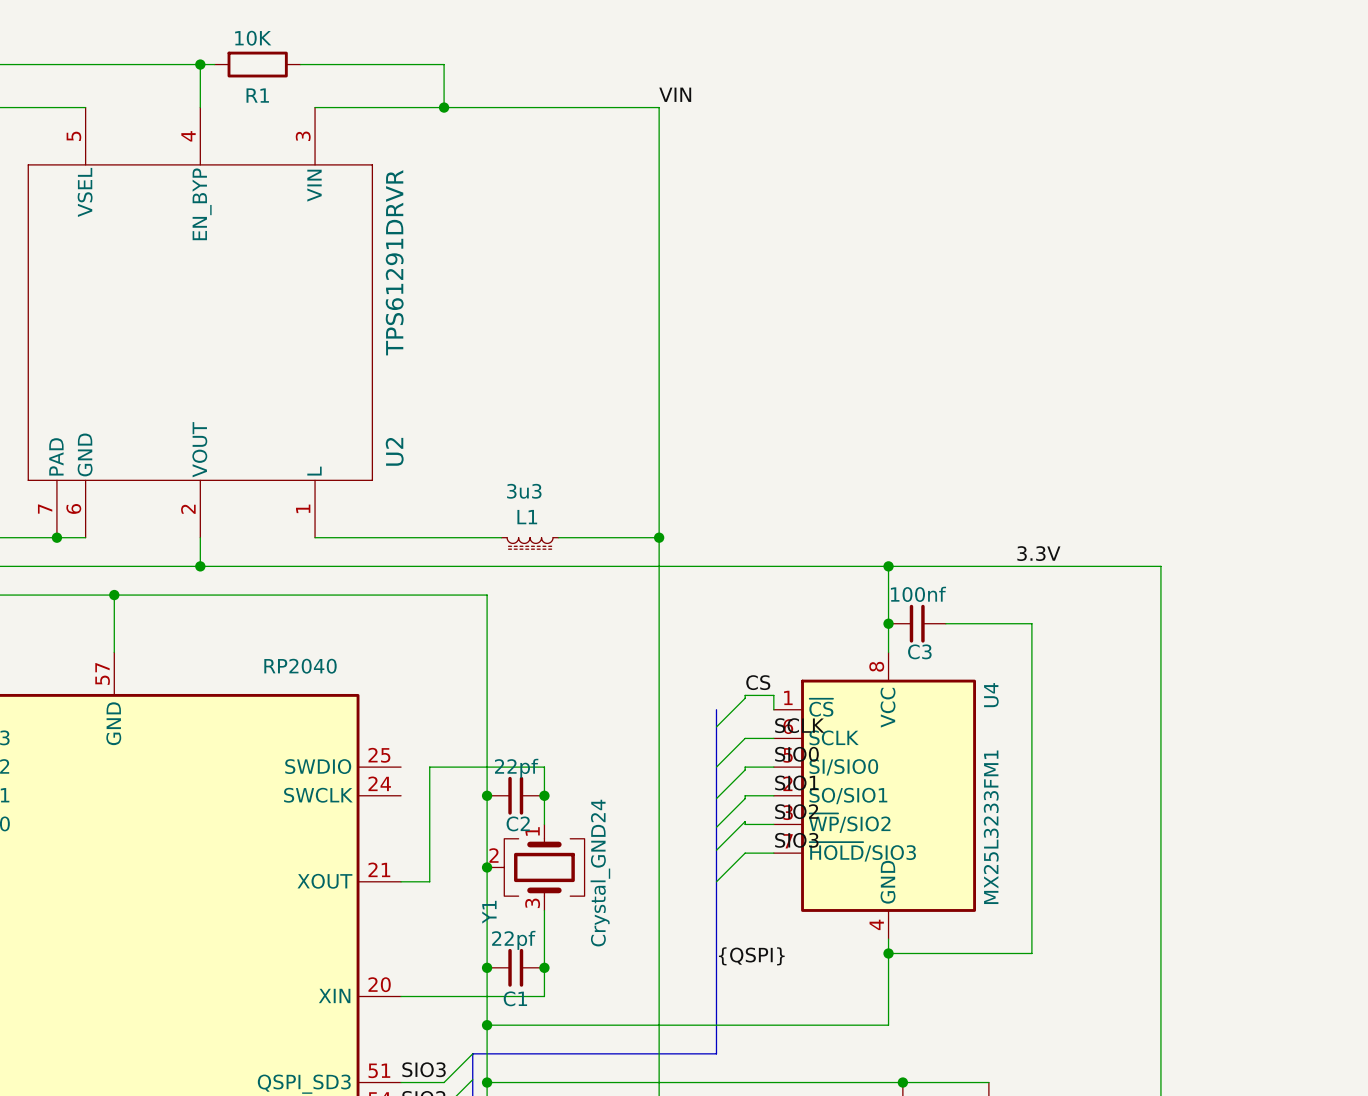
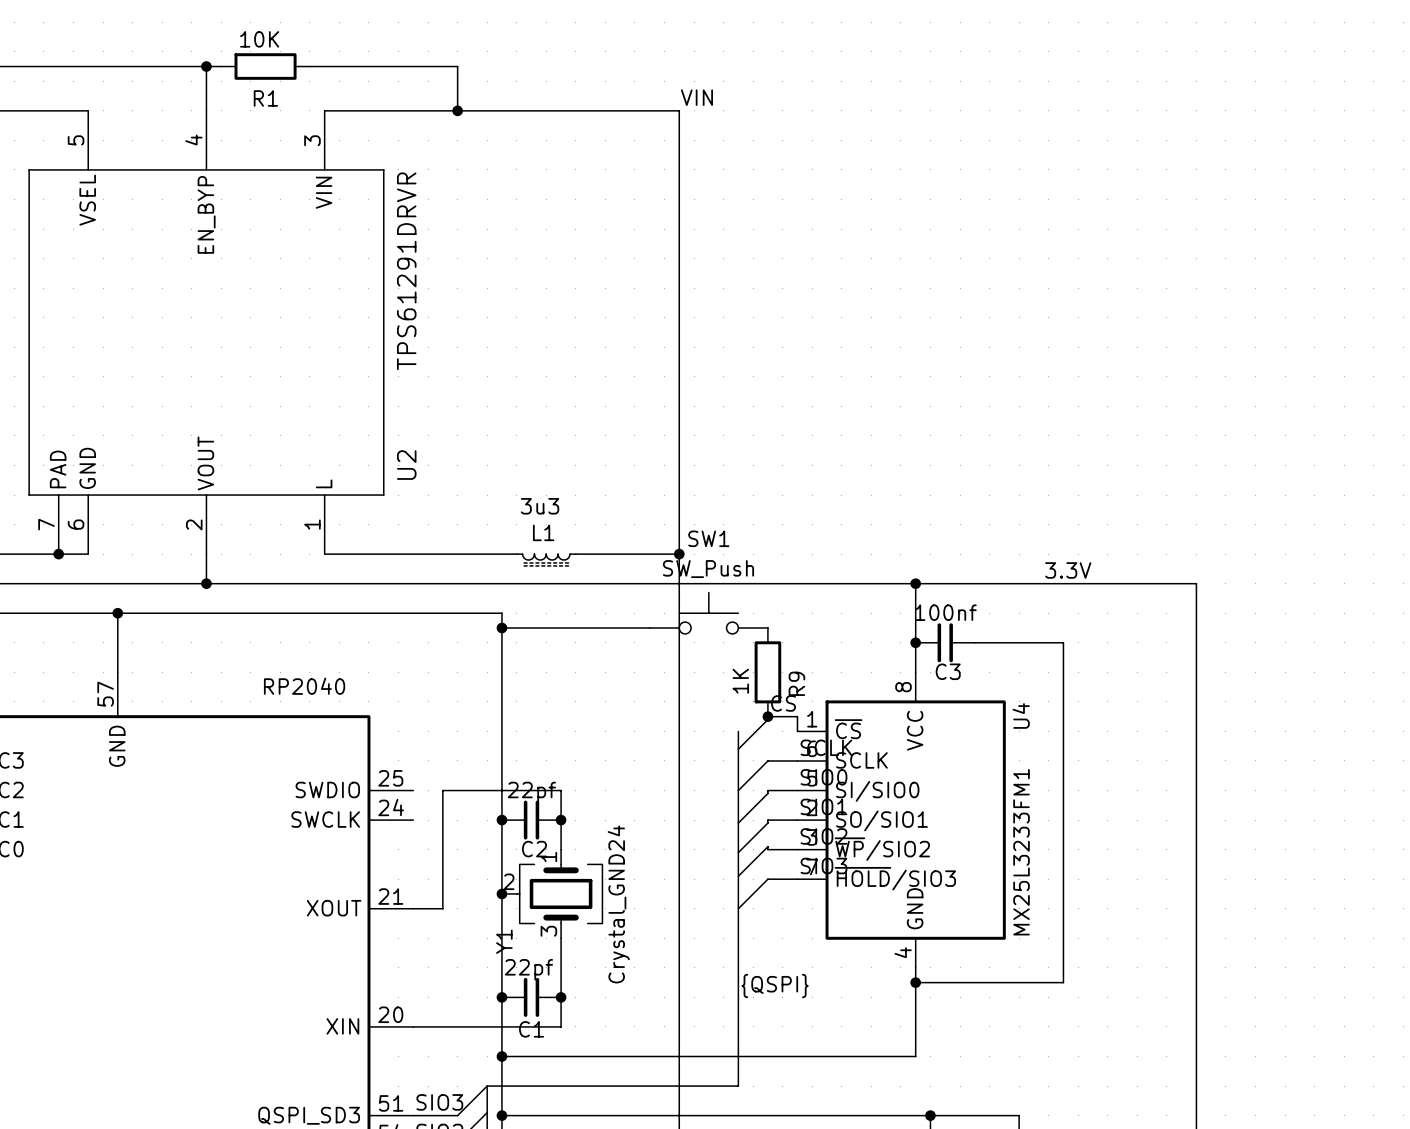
SW1: none -> SW_Push (708, 613)
wire: none -> (501, 628) (649, 628)
junction: none -> (501, 628)
R9: none -> 1K (767, 672)
junction: none -> (767, 716)

